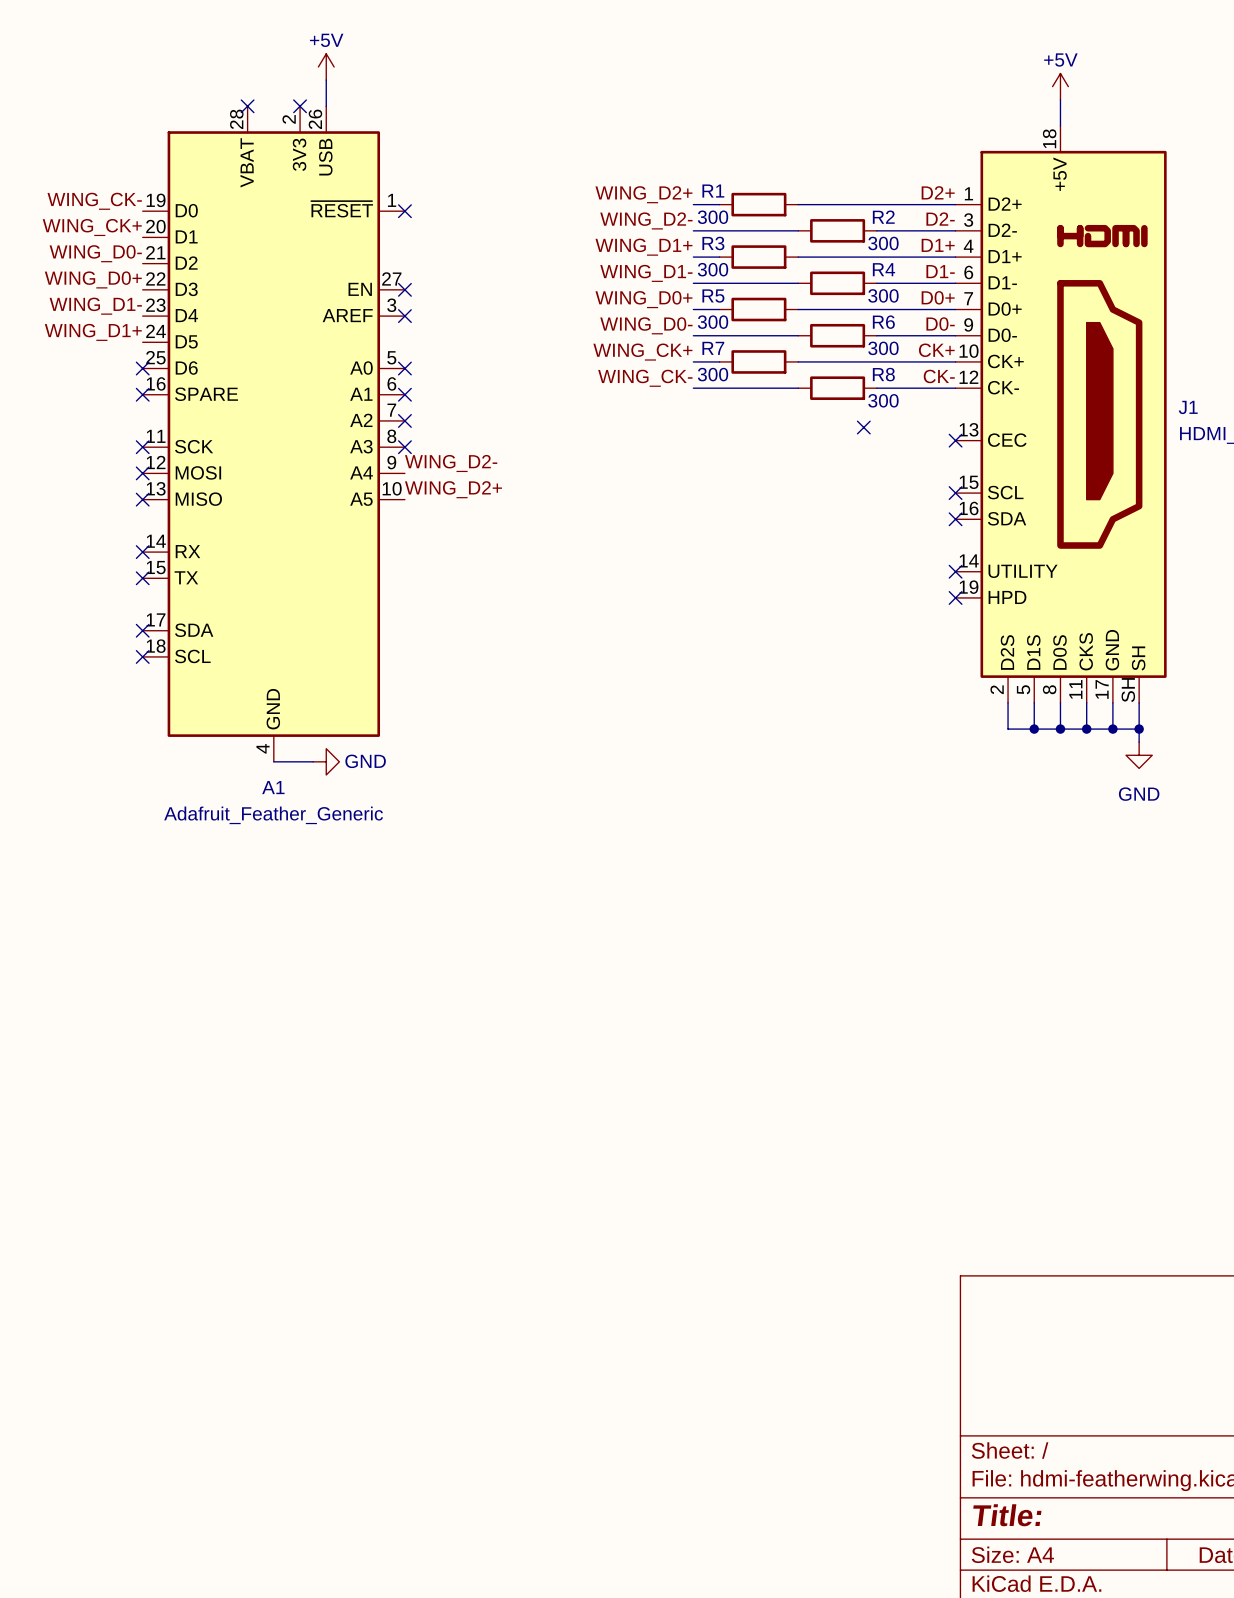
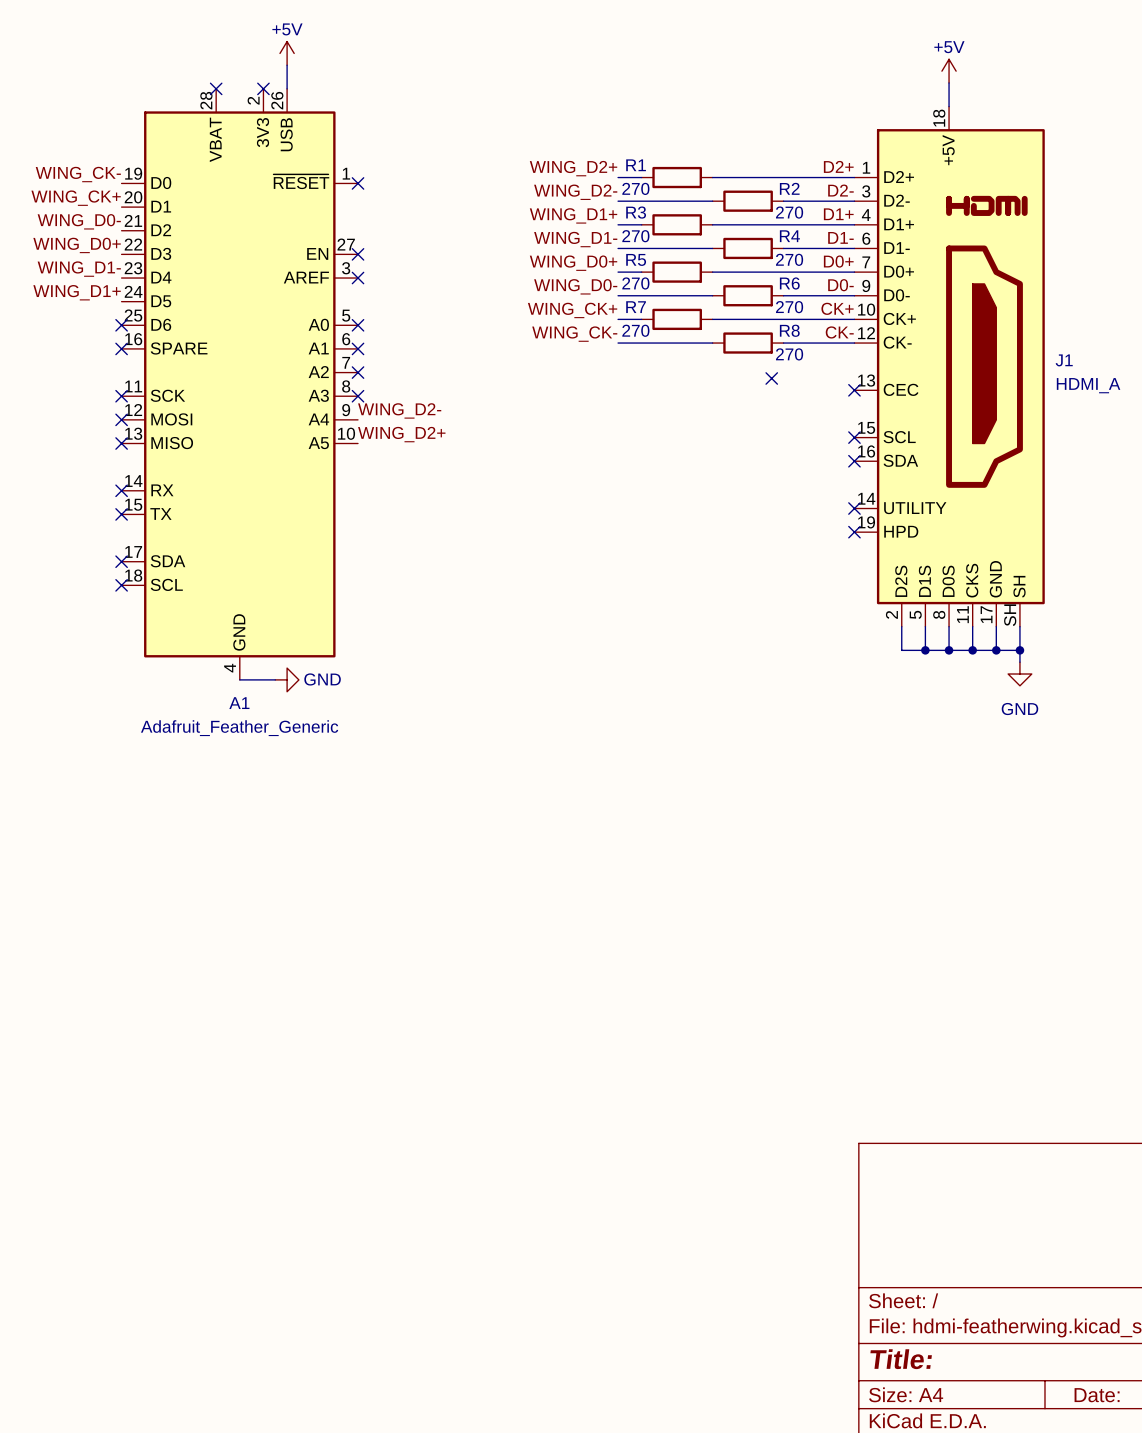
R1 value: 300 (713, 217) -> 270 (635, 188)
R2 value: 300 (883, 243) -> 270 (789, 212)
R3 value: 300 (713, 269) -> 270 (635, 236)
R4 value: 300 (883, 295) -> 270 (789, 259)
R5 value: 300 (713, 322) -> 270 (635, 283)
R6 value: 300 (883, 348) -> 270 (789, 307)
R7 value: 300 (713, 374) -> 270 (635, 330)
R8 value: 300 (883, 400) -> 270 (789, 354)

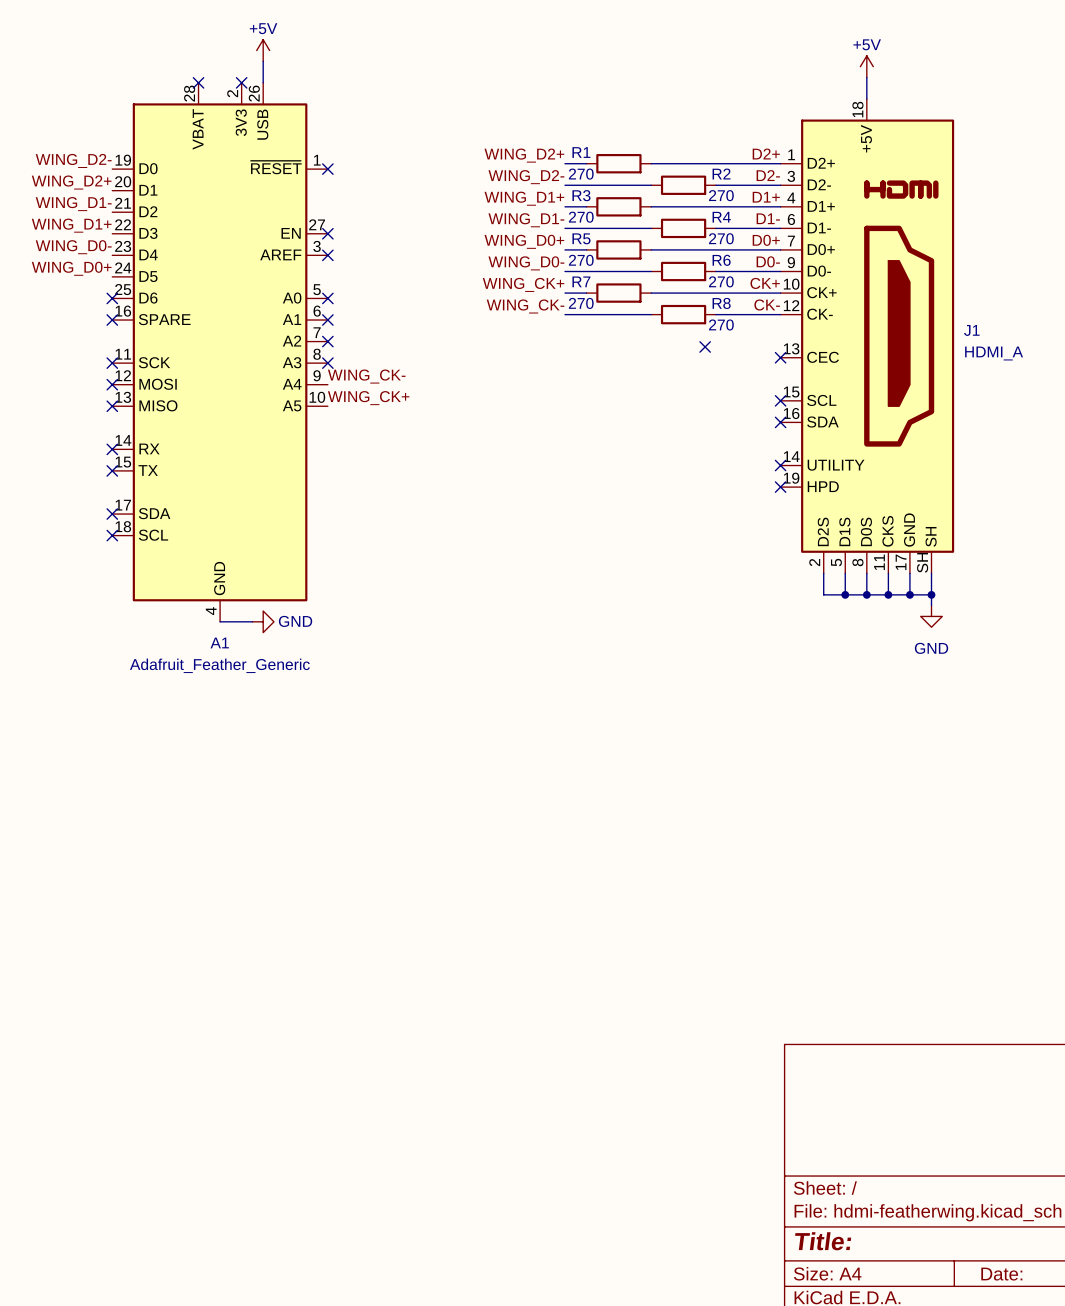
label: WING_CK- (78, 174) -> WING_D2- (73, 160)
label: WING_CK+ (76, 198) -> WING_D2+ (71, 182)
label: WING_D0- (79, 221) -> WING_D1- (73, 204)
label: WING_D0+ (77, 245) -> WING_D1+ (71, 225)
label: WING_D1- (79, 269) -> WING_D0- (73, 247)
label: WING_D1+ (77, 292) -> WING_D0+ (71, 268)
label: WING_D2- (399, 410) -> WING_CK- (366, 376)
label: WING_D2+ (401, 434) -> WING_CK+ (368, 398)

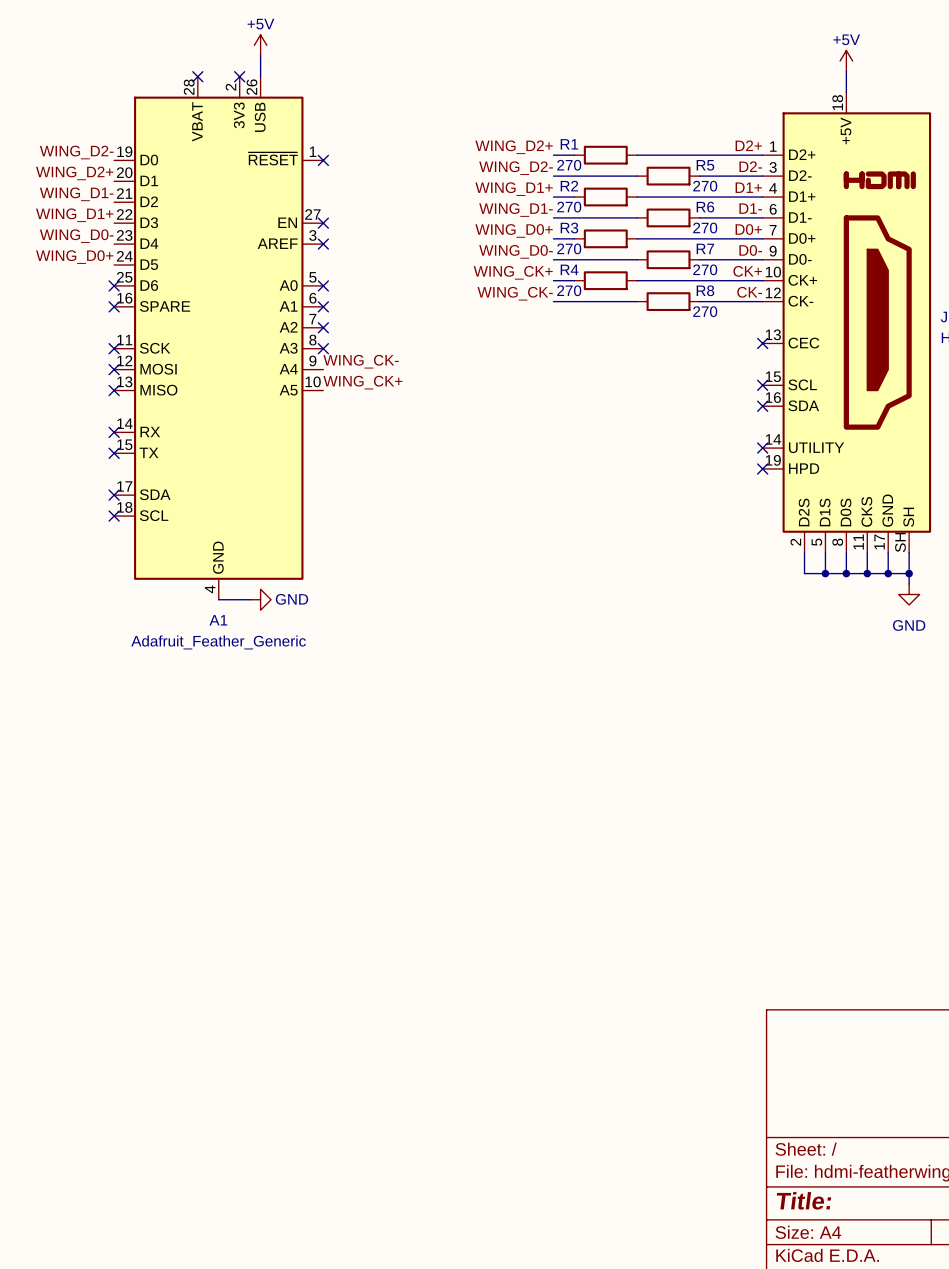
R2 name: R2 (721, 174) -> R5 (705, 165)
R3 name: R3 (581, 195) -> R2 (569, 186)
R4 name: R4 (721, 217) -> R6 (705, 207)
R5 name: R5 (581, 238) -> R3 (569, 228)
R6 name: R6 (721, 260) -> R7 (705, 248)
R7 name: R7 (581, 281) -> R4 (569, 269)
no-connect mark: (705, 346) -> none

